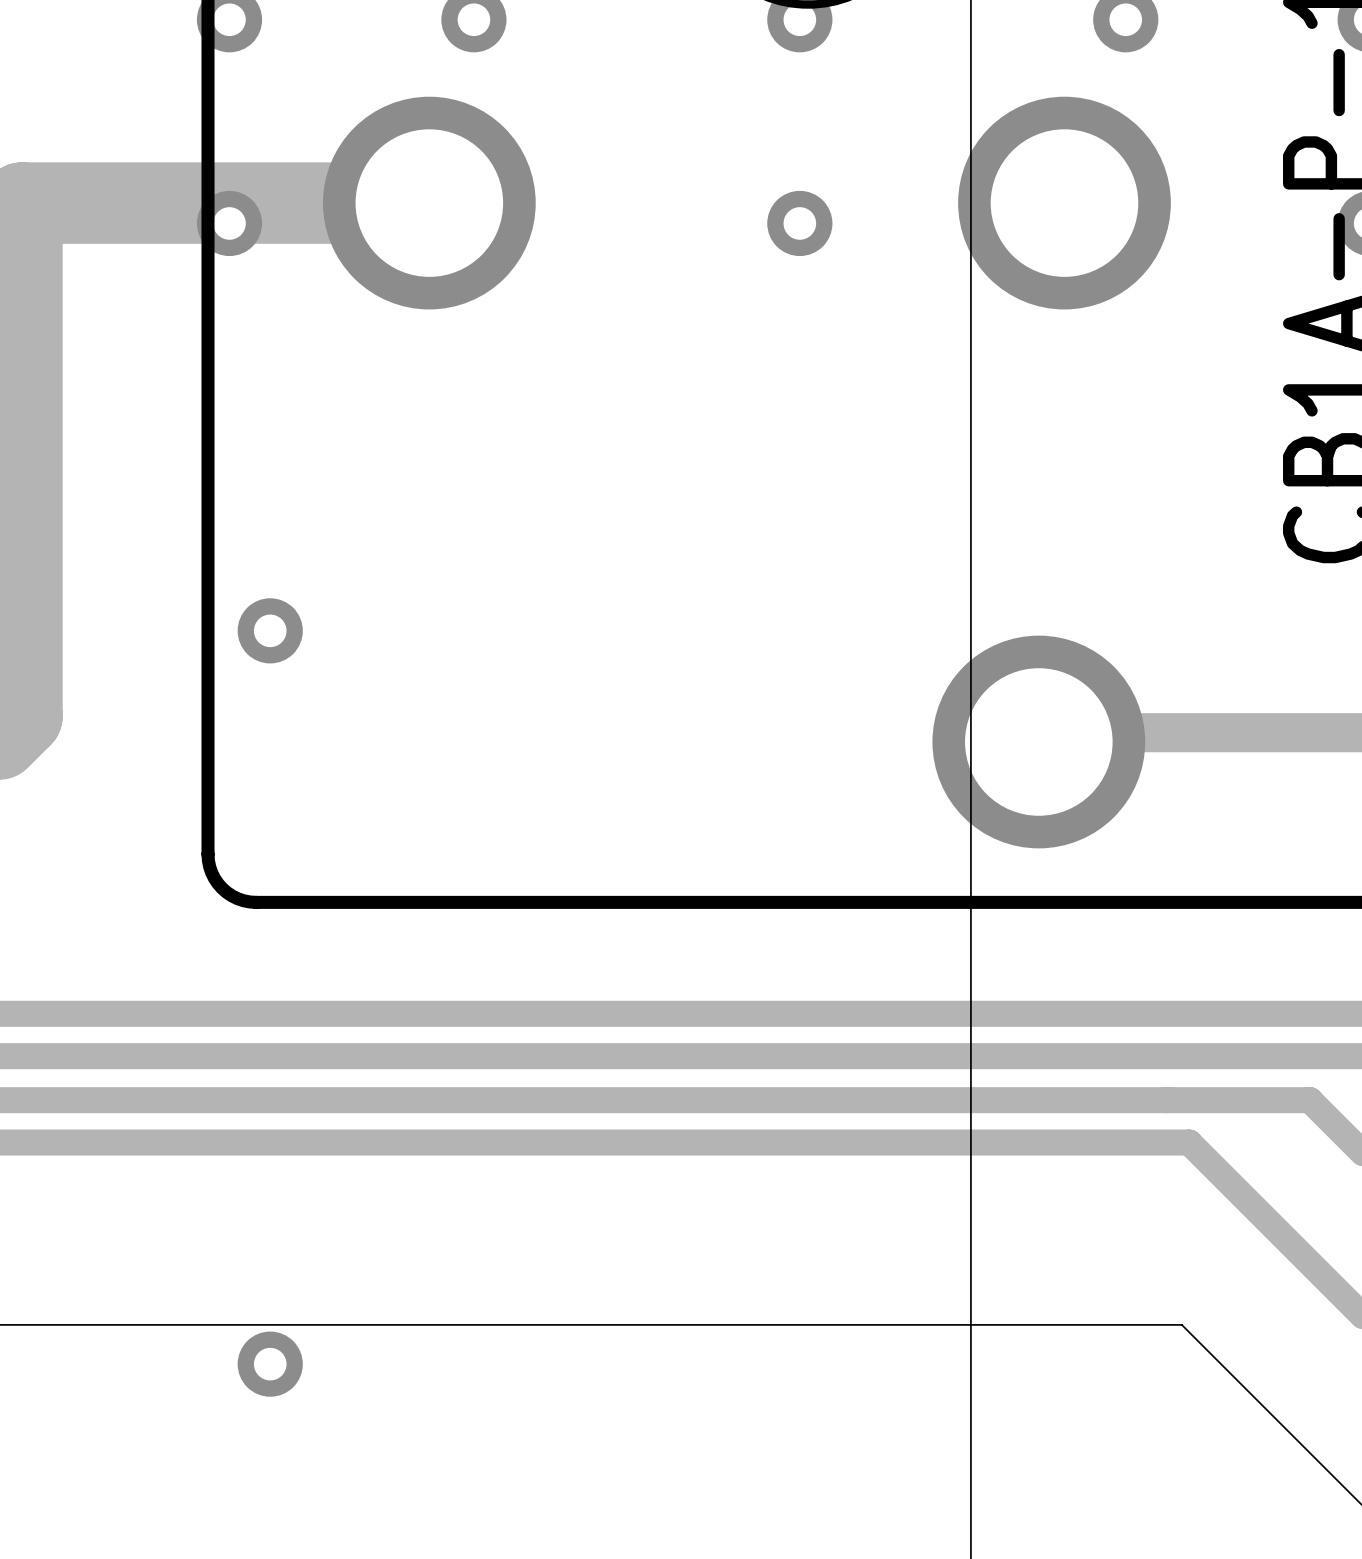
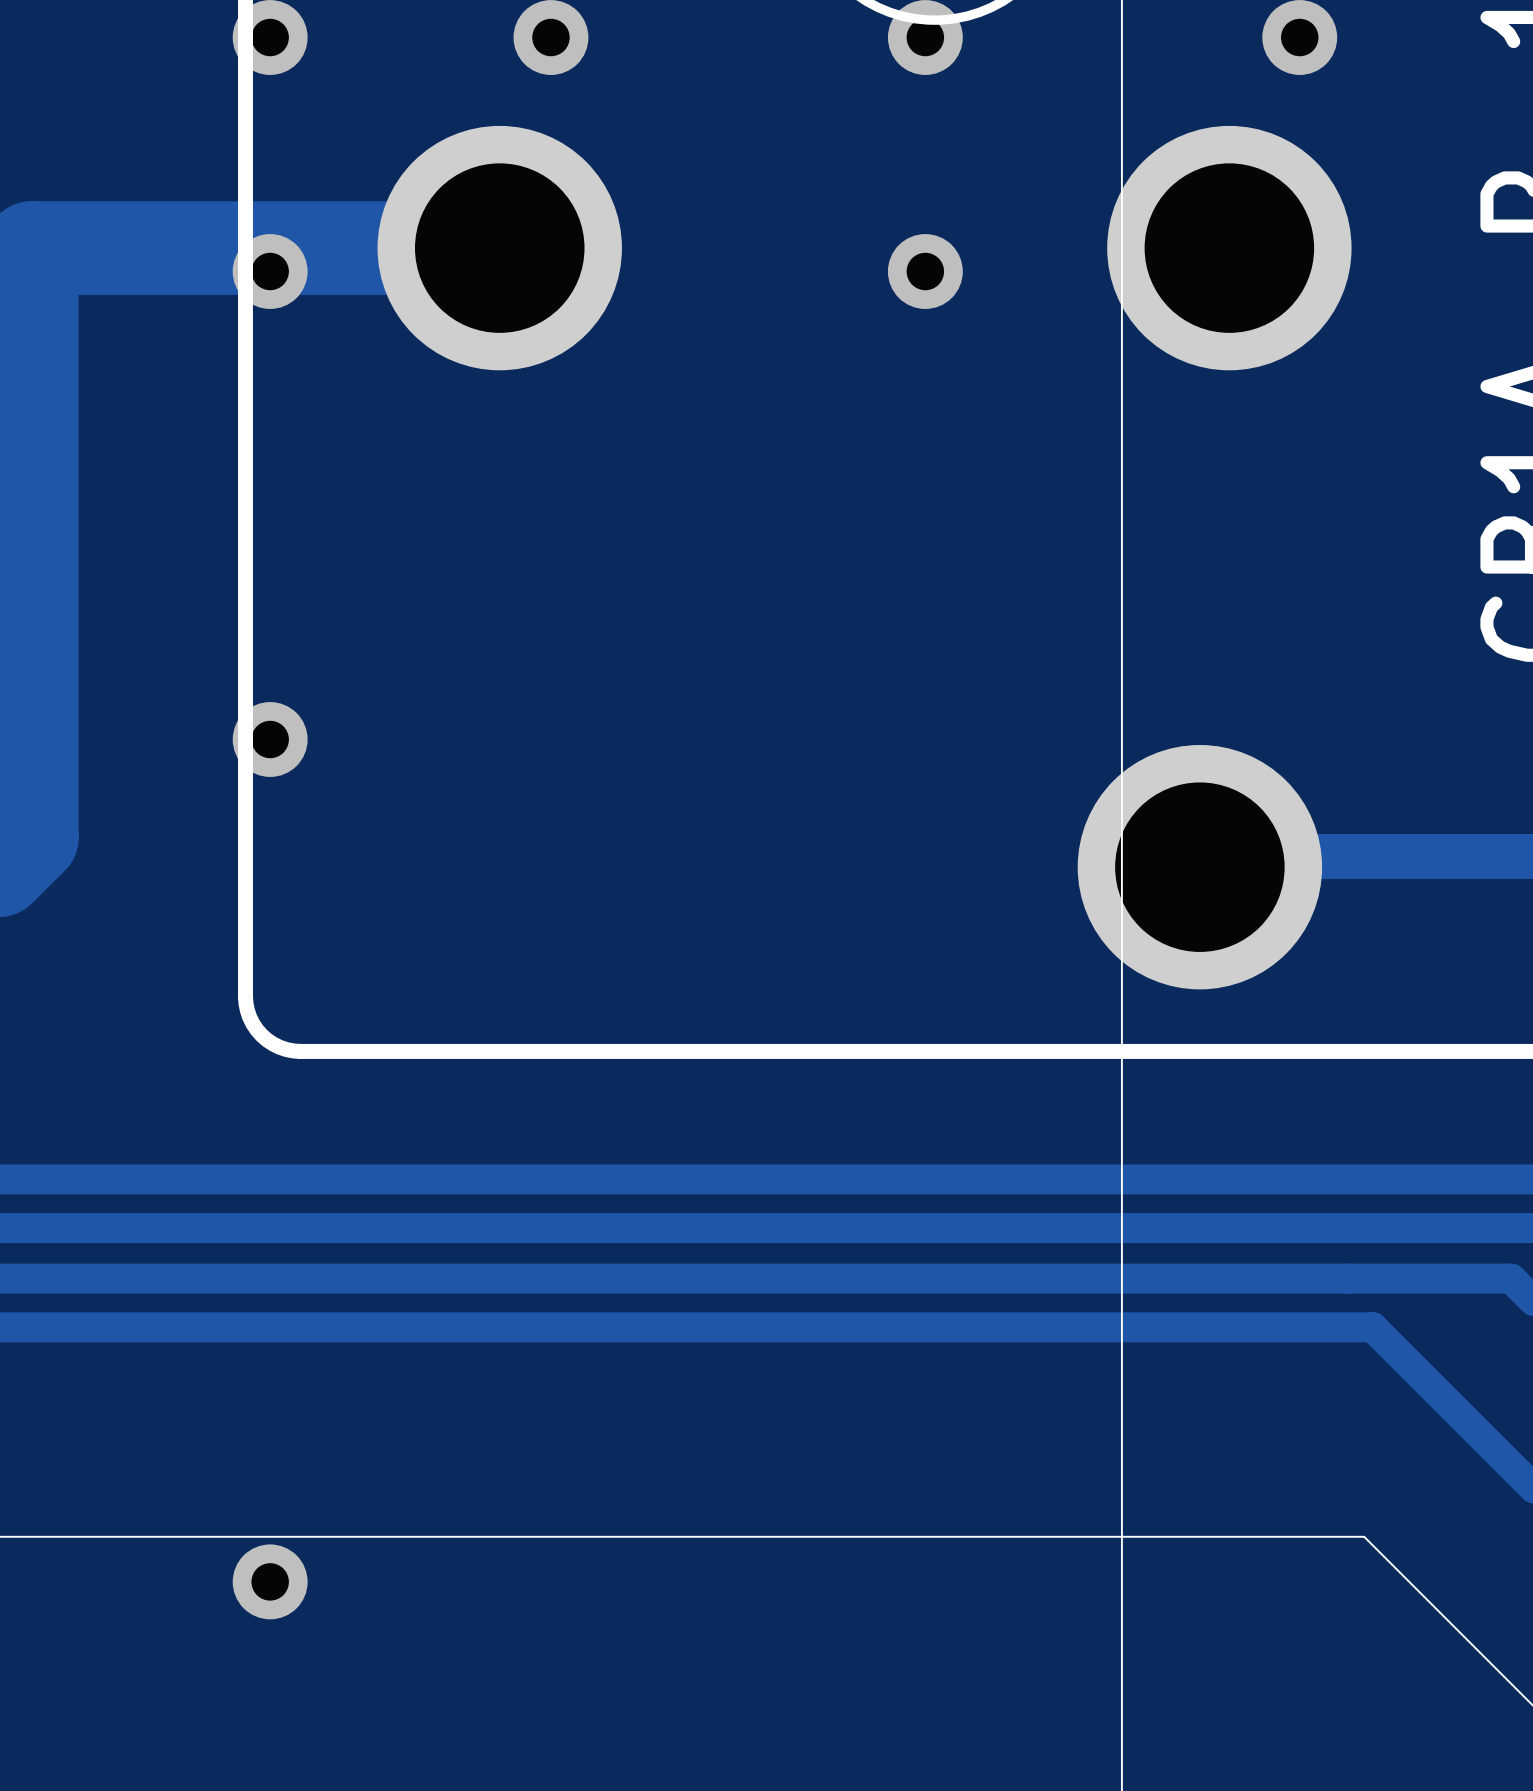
via position: (270, 630) -> (270, 739)
via position: (270, 1364) -> (270, 1581)

